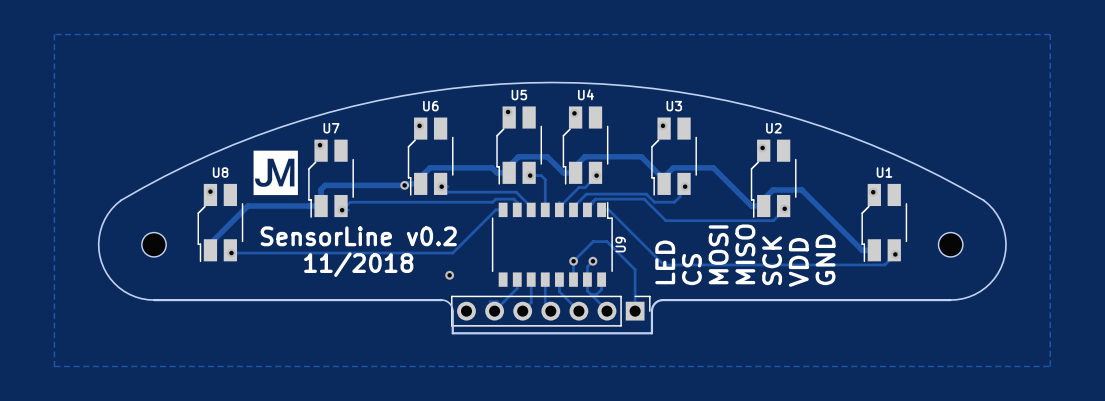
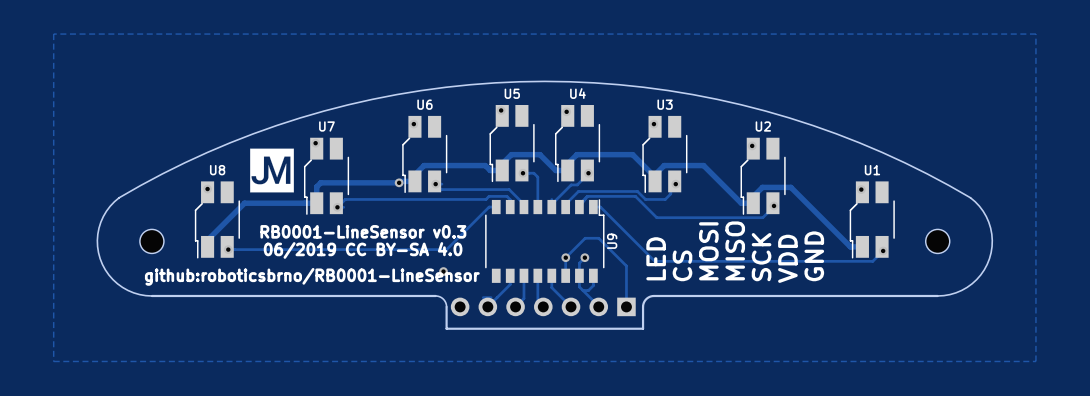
text: none -> RB0001-LineSensor v0.3 (363, 231)
text: SensorLine v0.2 (358, 236) -> none
text: none -> 06/2019 CC BY-SA 4.0 (363, 250)
text: 11/2018 (358, 264) -> none
text: none -> github:roboticsbrno/RB0001-LineSensor (312, 276)
part side: top (550, 311) -> bottom (543, 306)

